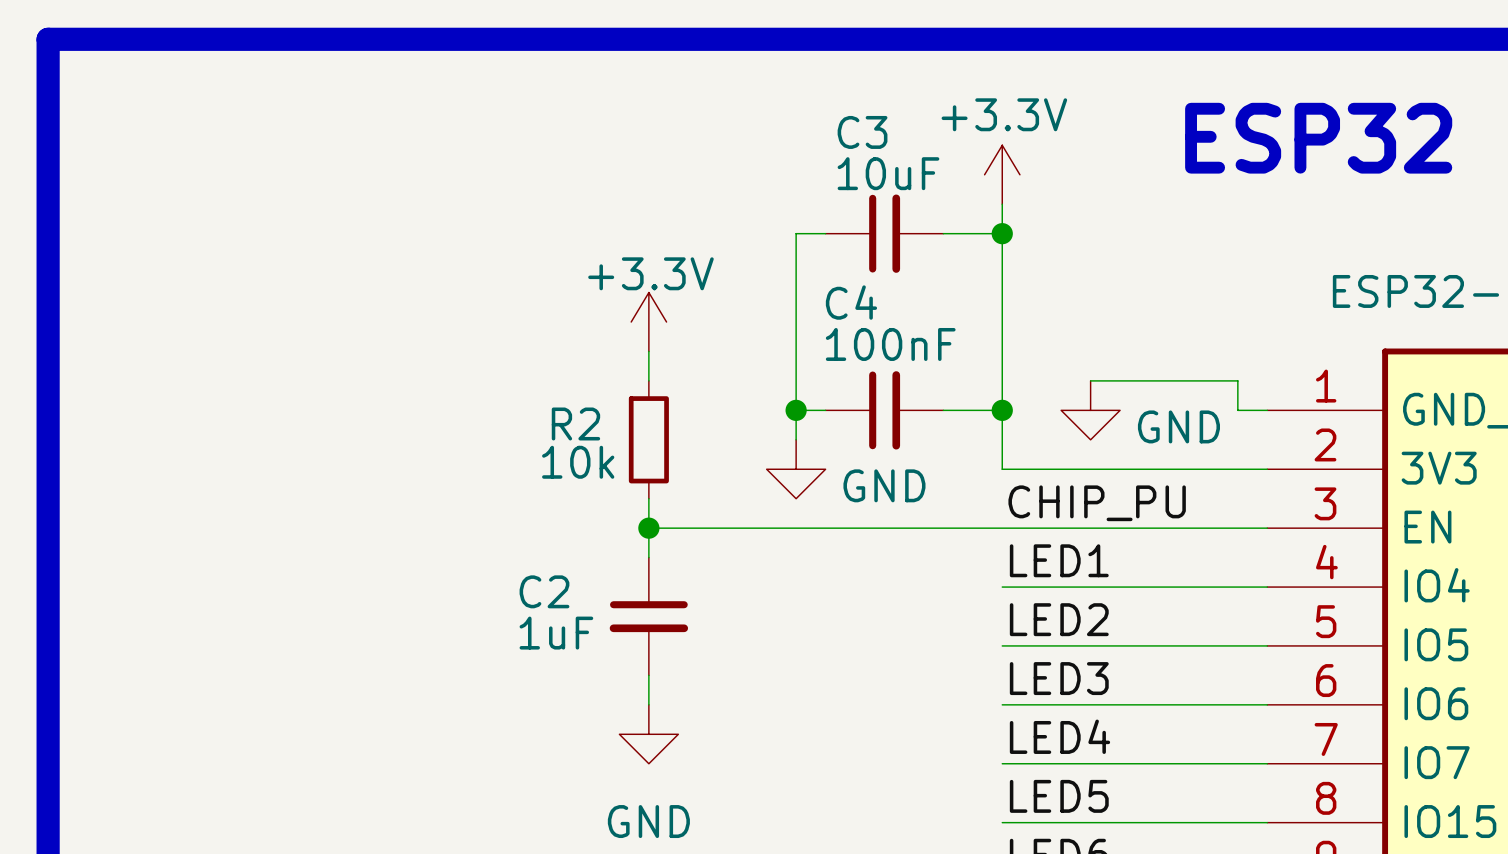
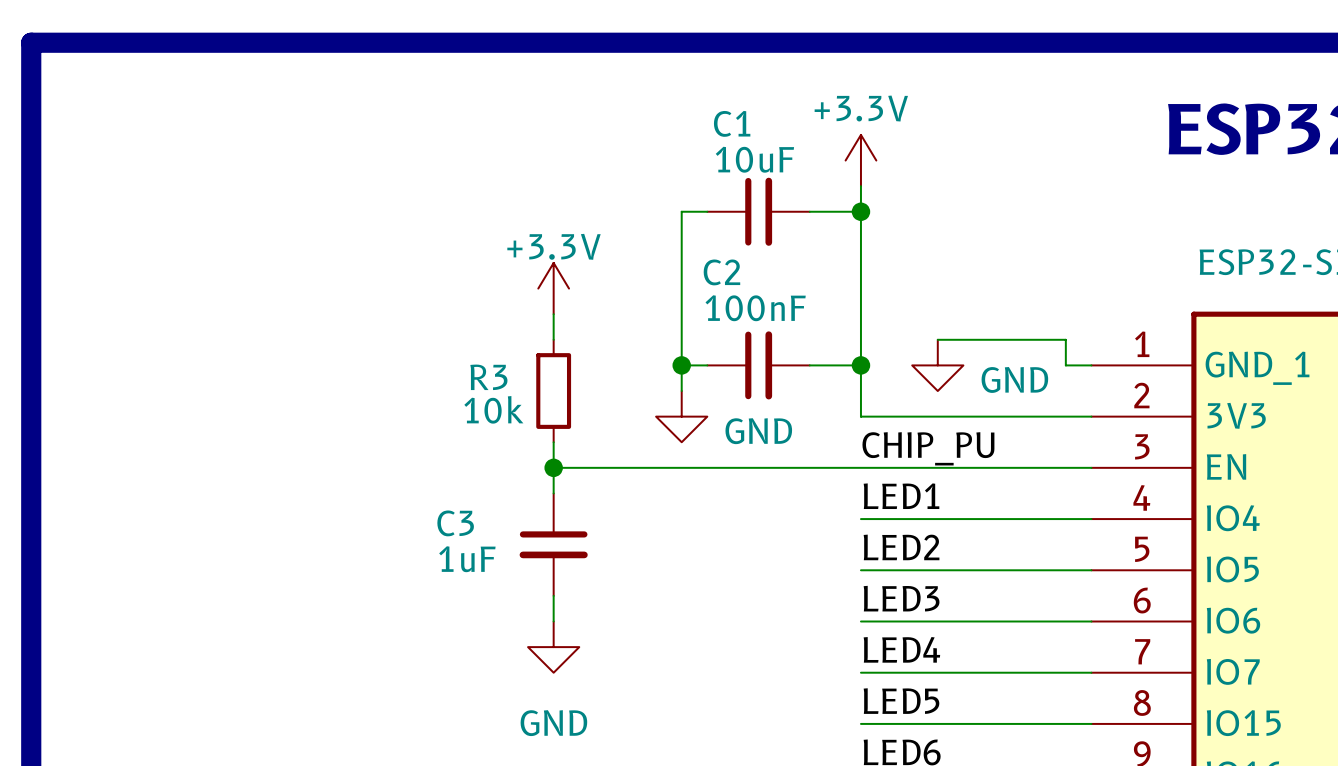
C3 name: C3 (862, 132) -> C1 (732, 123)
C4 name: C4 (851, 302) -> C2 (721, 272)
R2 name: R2 (575, 423) -> R3 (488, 377)
C2 name: C2 (544, 591) -> C3 (455, 523)

